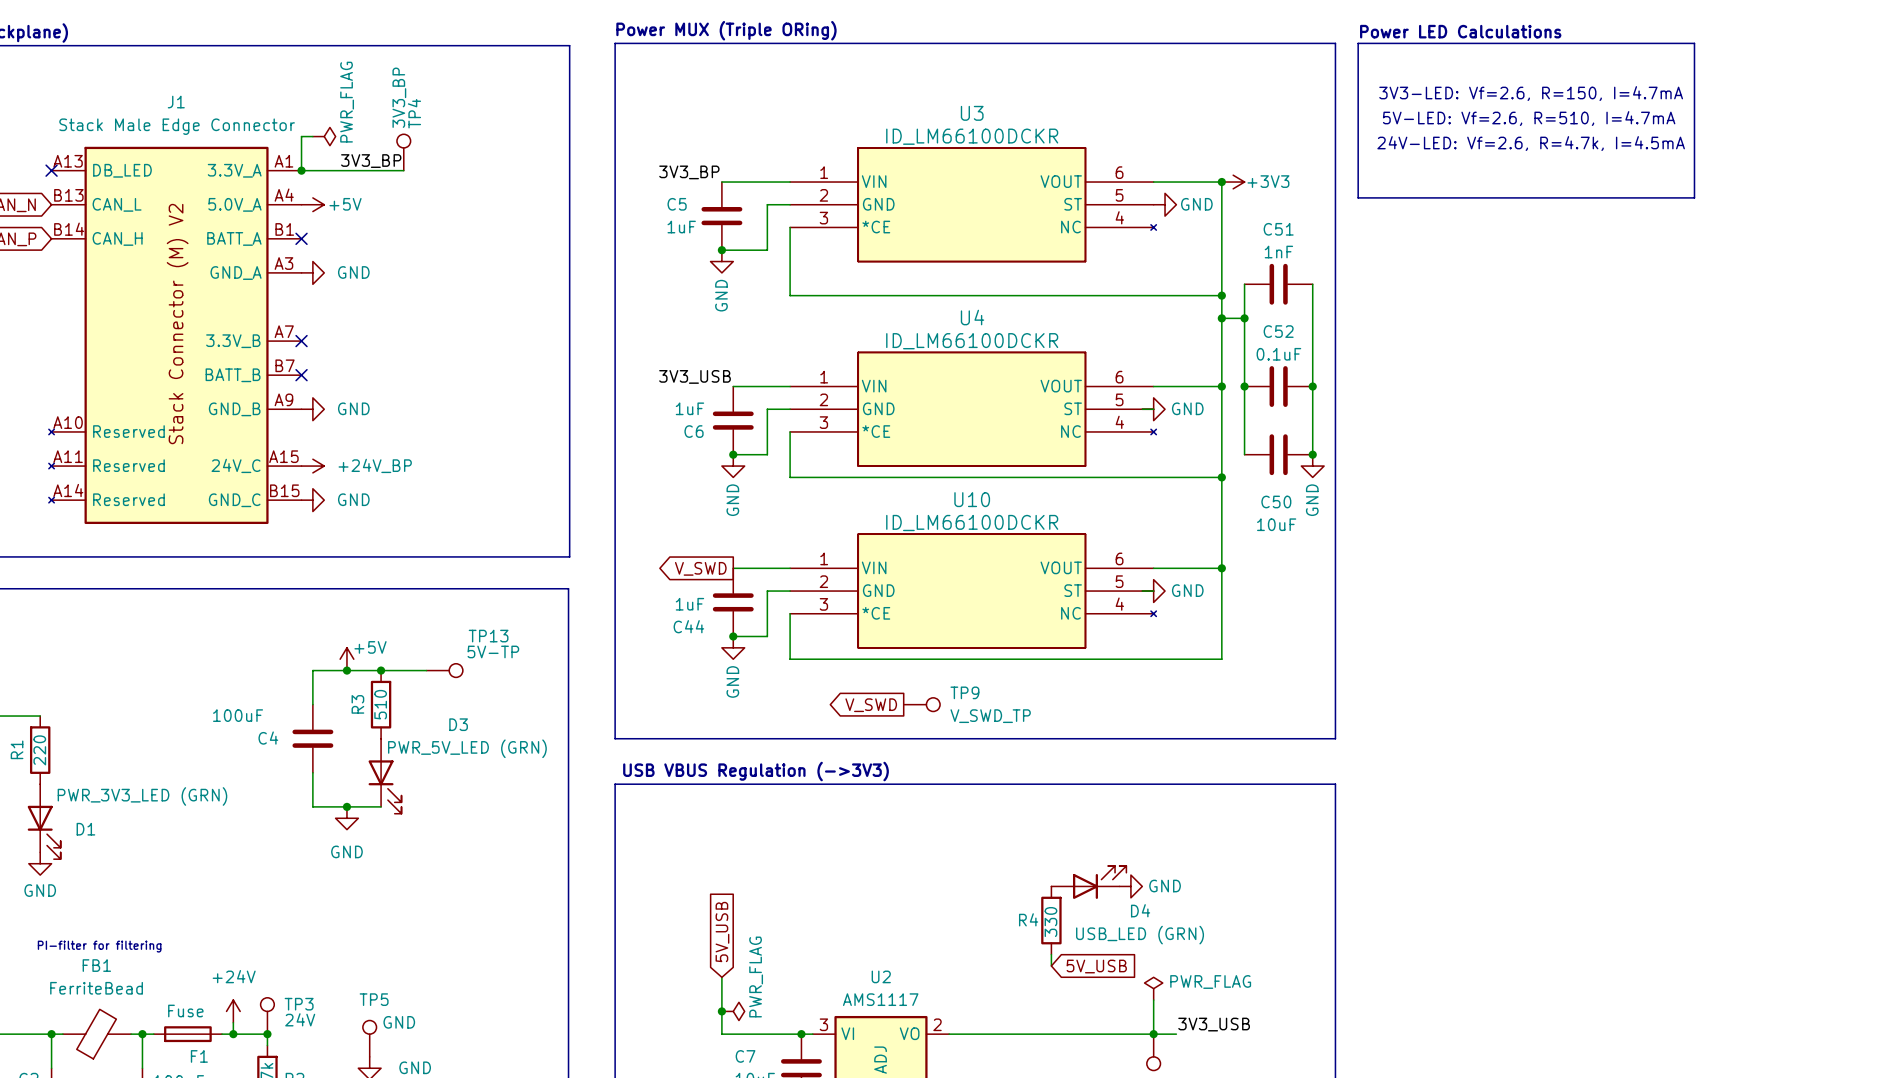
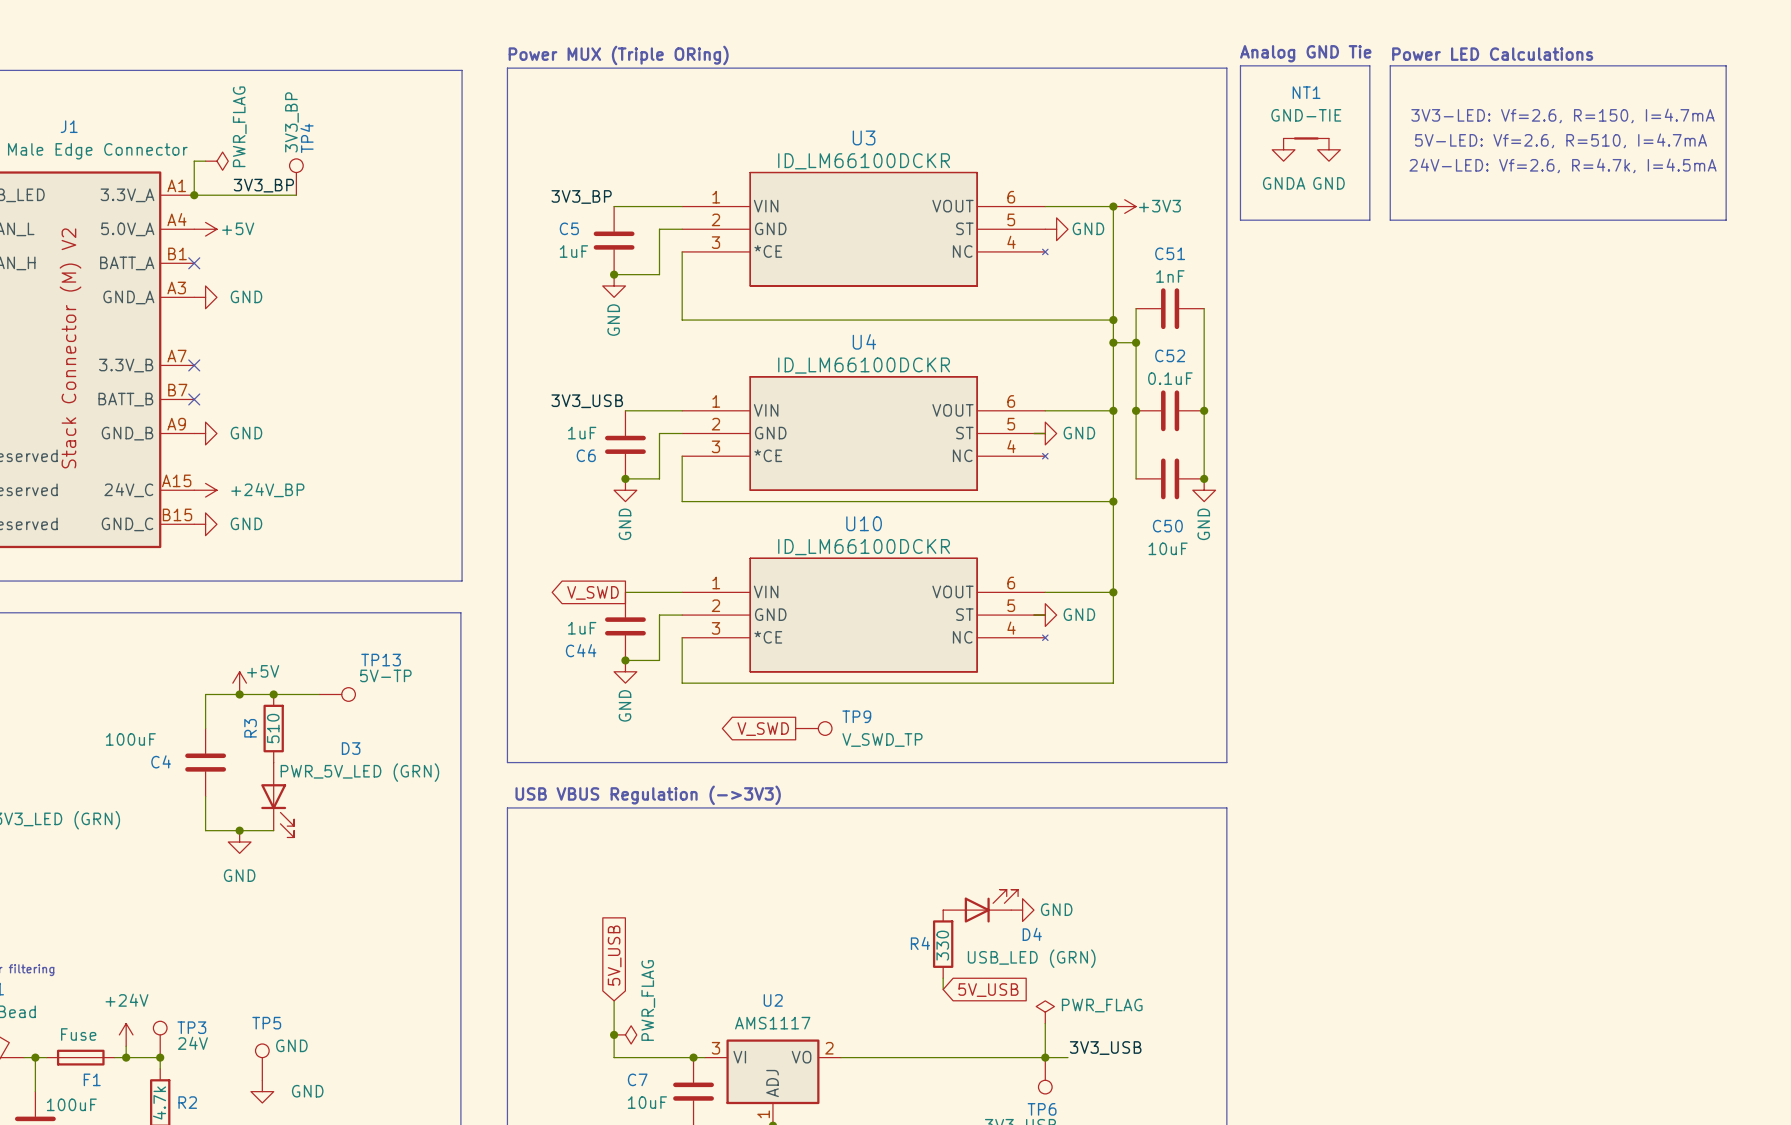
text: none -> Analog GND Tie (1305, 53)
text position: Power LED Calculations (1460, 31) -> Power LED Calculations (1492, 54)
line: none -> (1240, 65) (1369, 65) (1369, 220) (1240, 220) (1240, 65)
line: (1358, 43) (1694, 43) (1694, 197) (1358, 197) (1358, 43) -> (1390, 65) (1726, 65) (1726, 220) (1390, 220) (1390, 65)
text position: 3V3-LED: Vf=2.6, R=150, I=4.7mA (1531, 93) -> 3V3-LED: Vf=2.6, R=150, I=4.7mA (1563, 115)
NT1: none -> GND-TIE (1306, 138)
text position: 5V-LED: Vf=2.6, R=510, I=4.7mA (1529, 118) -> 5V-LED: Vf=2.6, R=510, I=4.7mA (1561, 140)
power symbol: none -> GNDA (1283, 149)
power symbol: none -> GND (1328, 149)
text position: 24V-LED: Vf=2.6, R=4.7k, I=4.5mA (1531, 143) -> 24V-LED: Vf=2.6, R=4.7k, I=4.5mA (1563, 165)

